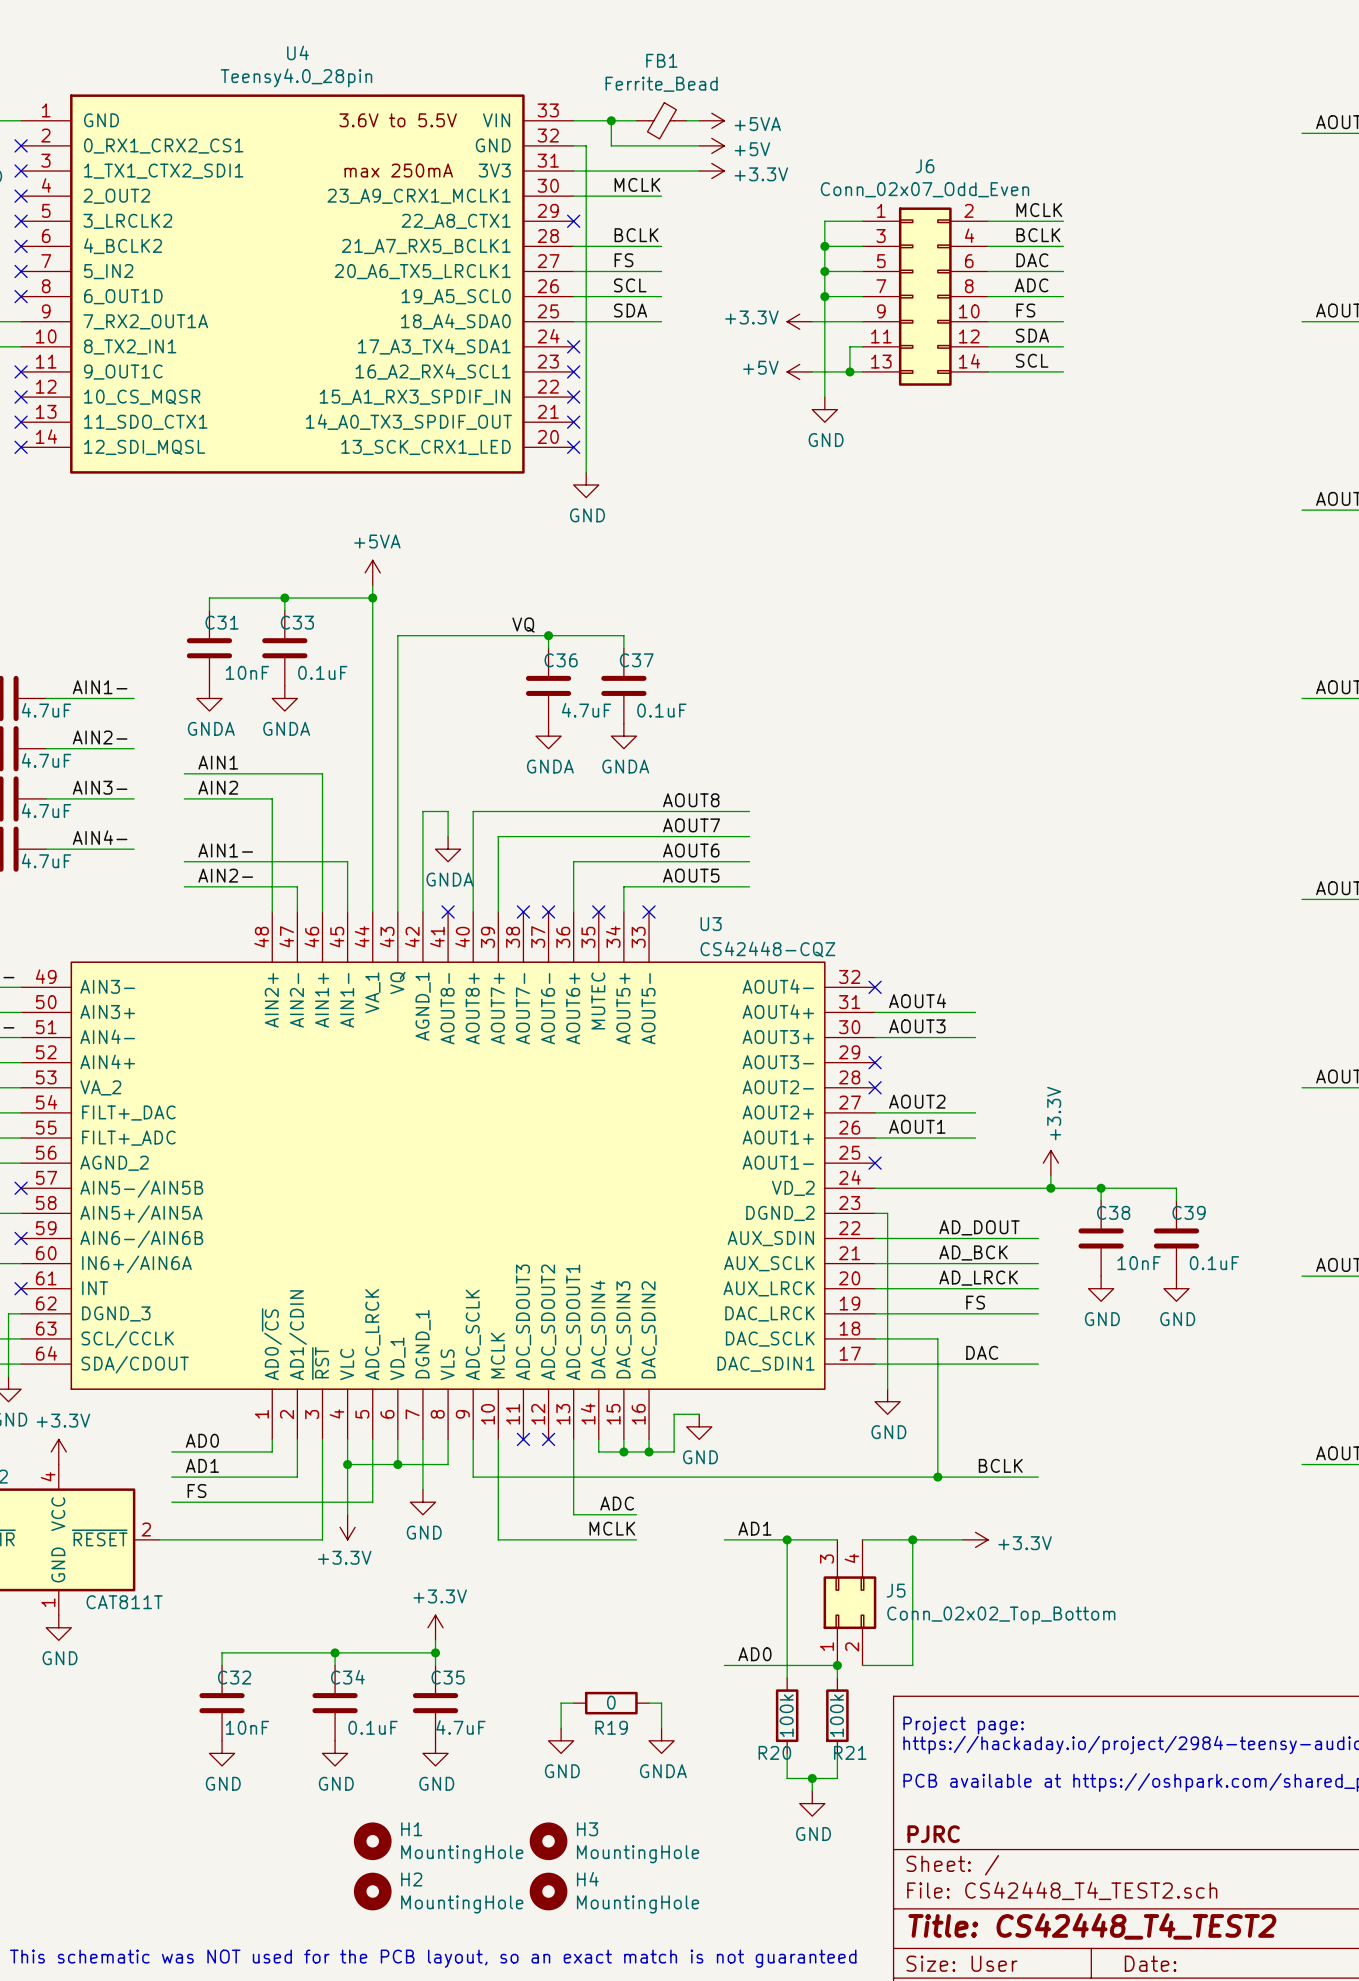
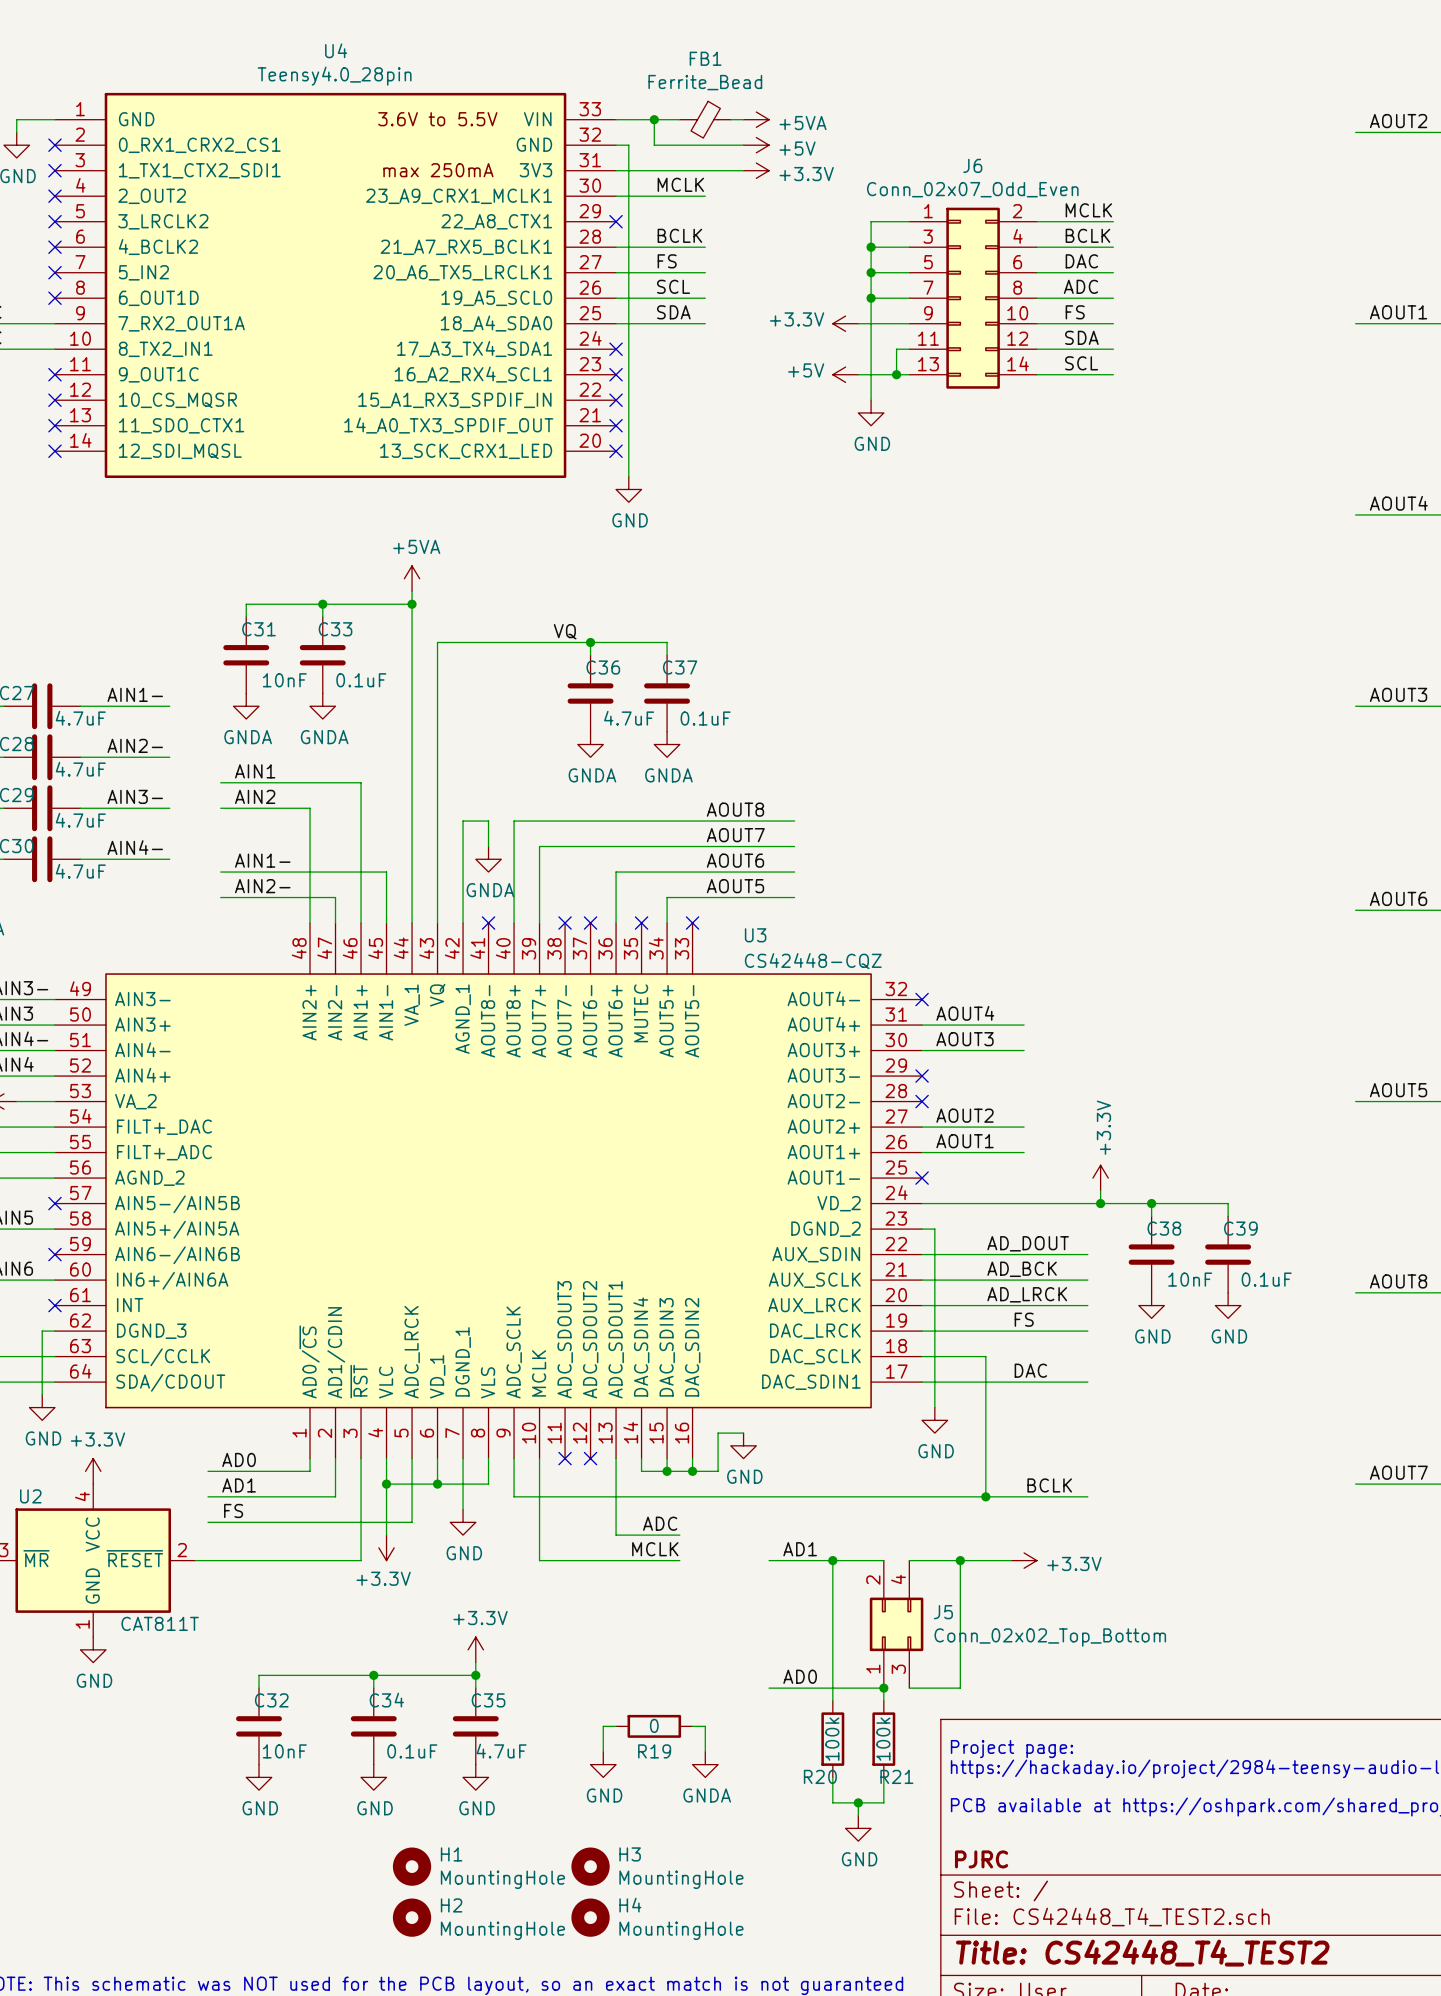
J5 pin number: 3 (827, 1559) -> 2 (873, 1580)
J5 pin number: 2 (852, 1646) -> 3 (898, 1669)

